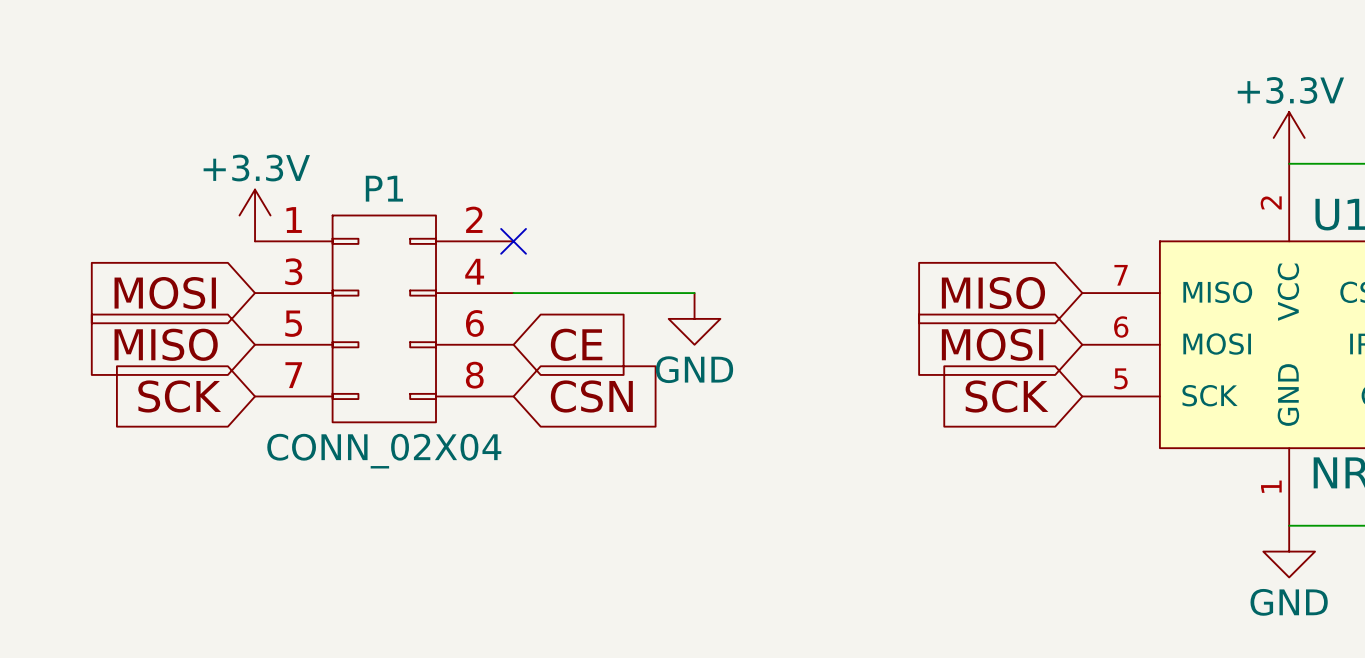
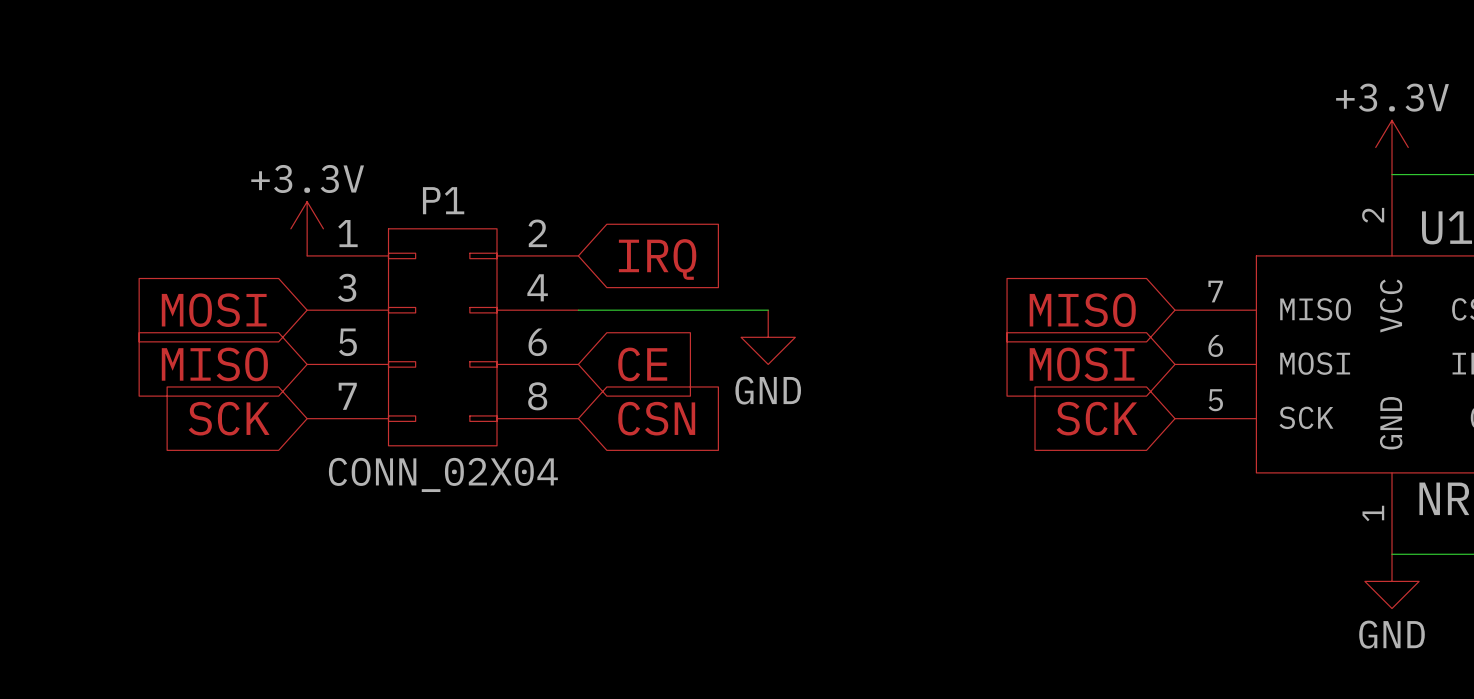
no-connect mark: (513, 241) -> none
global label: none -> IRQ (657, 259)

